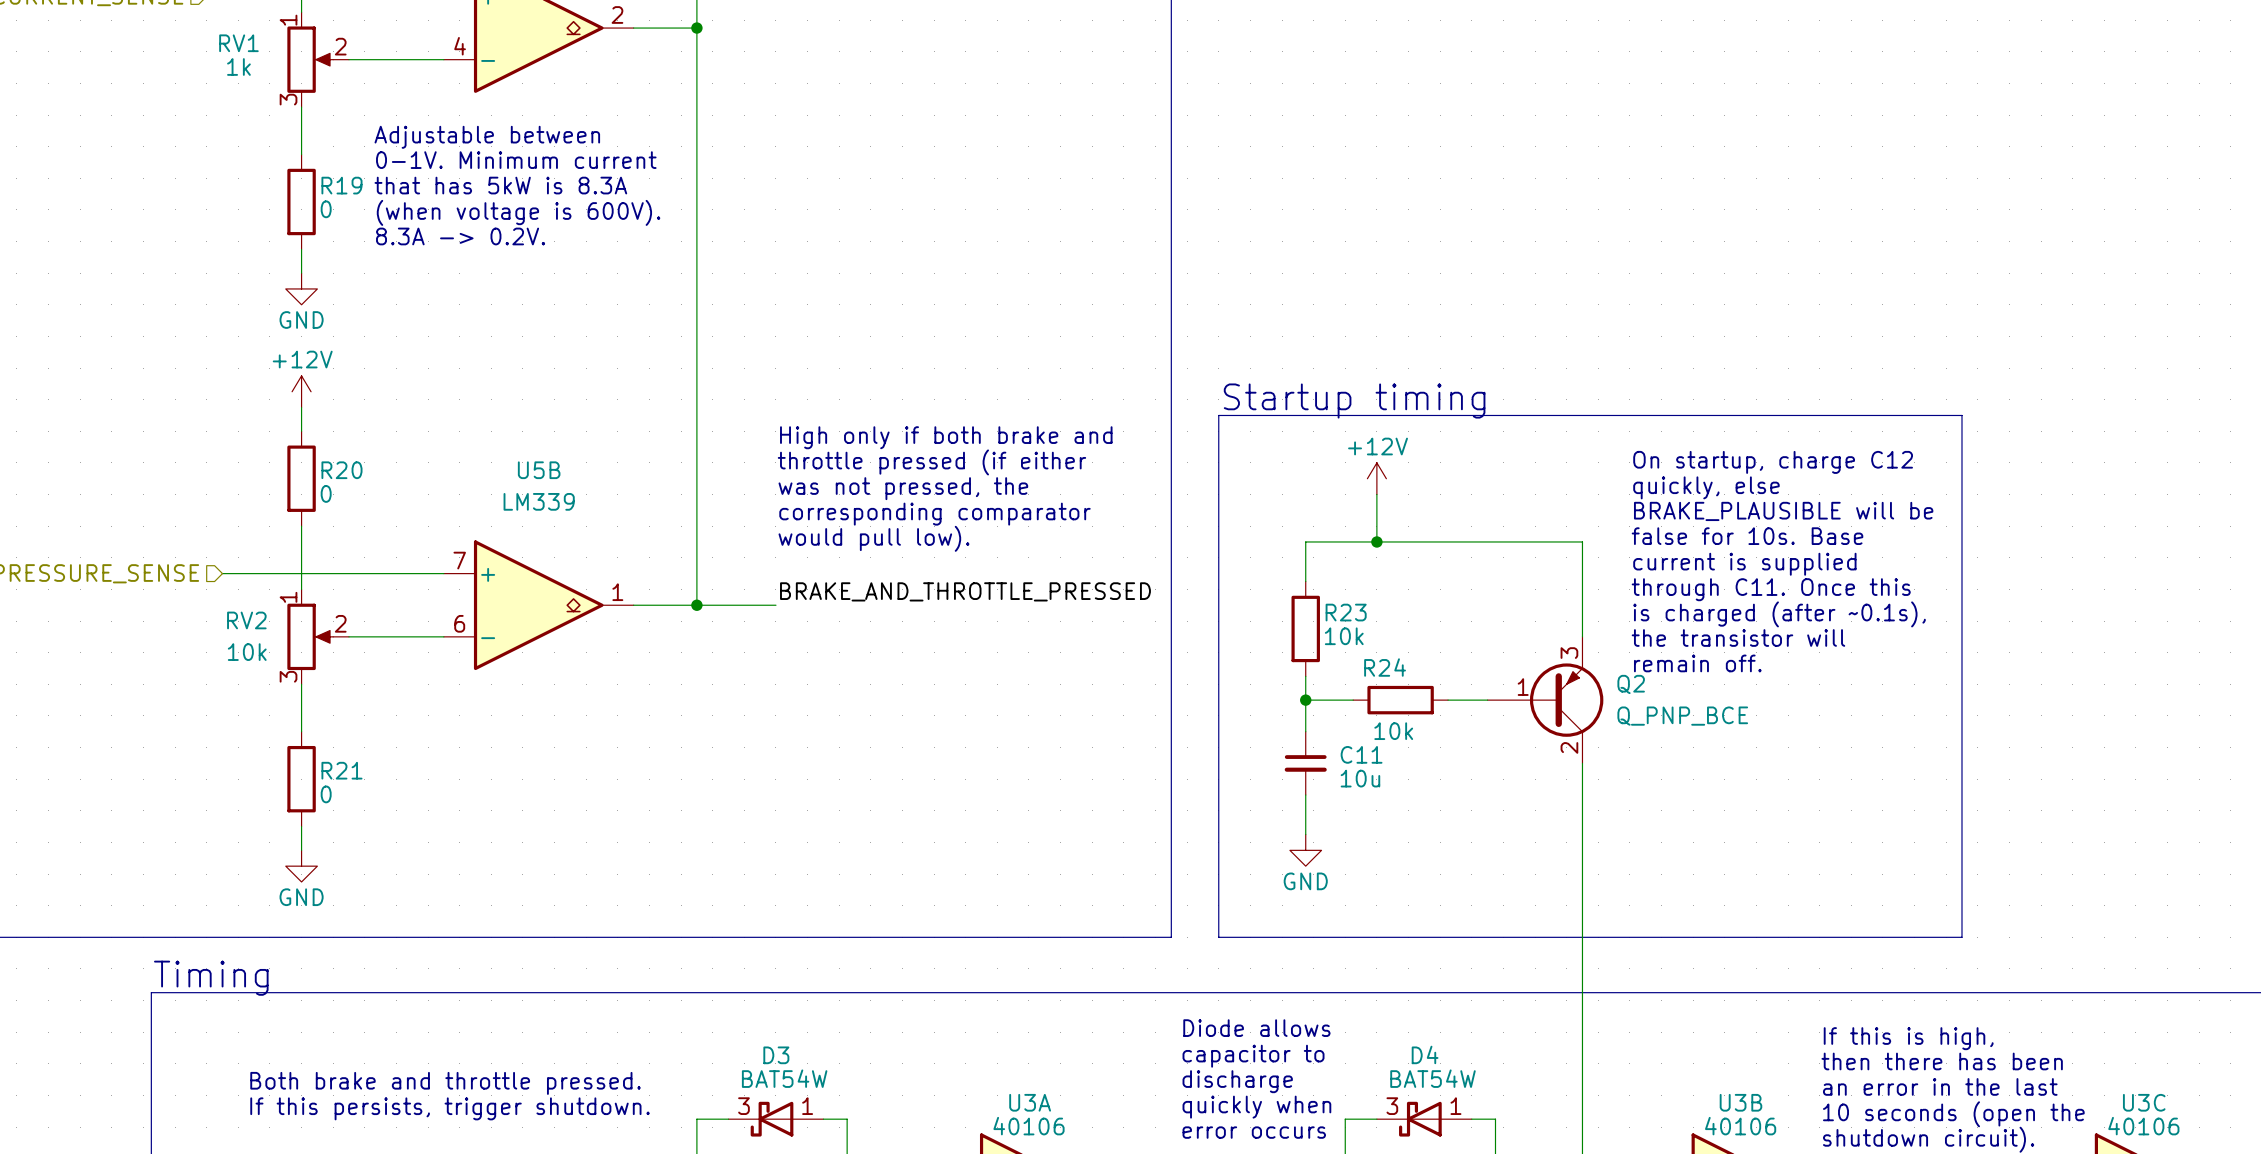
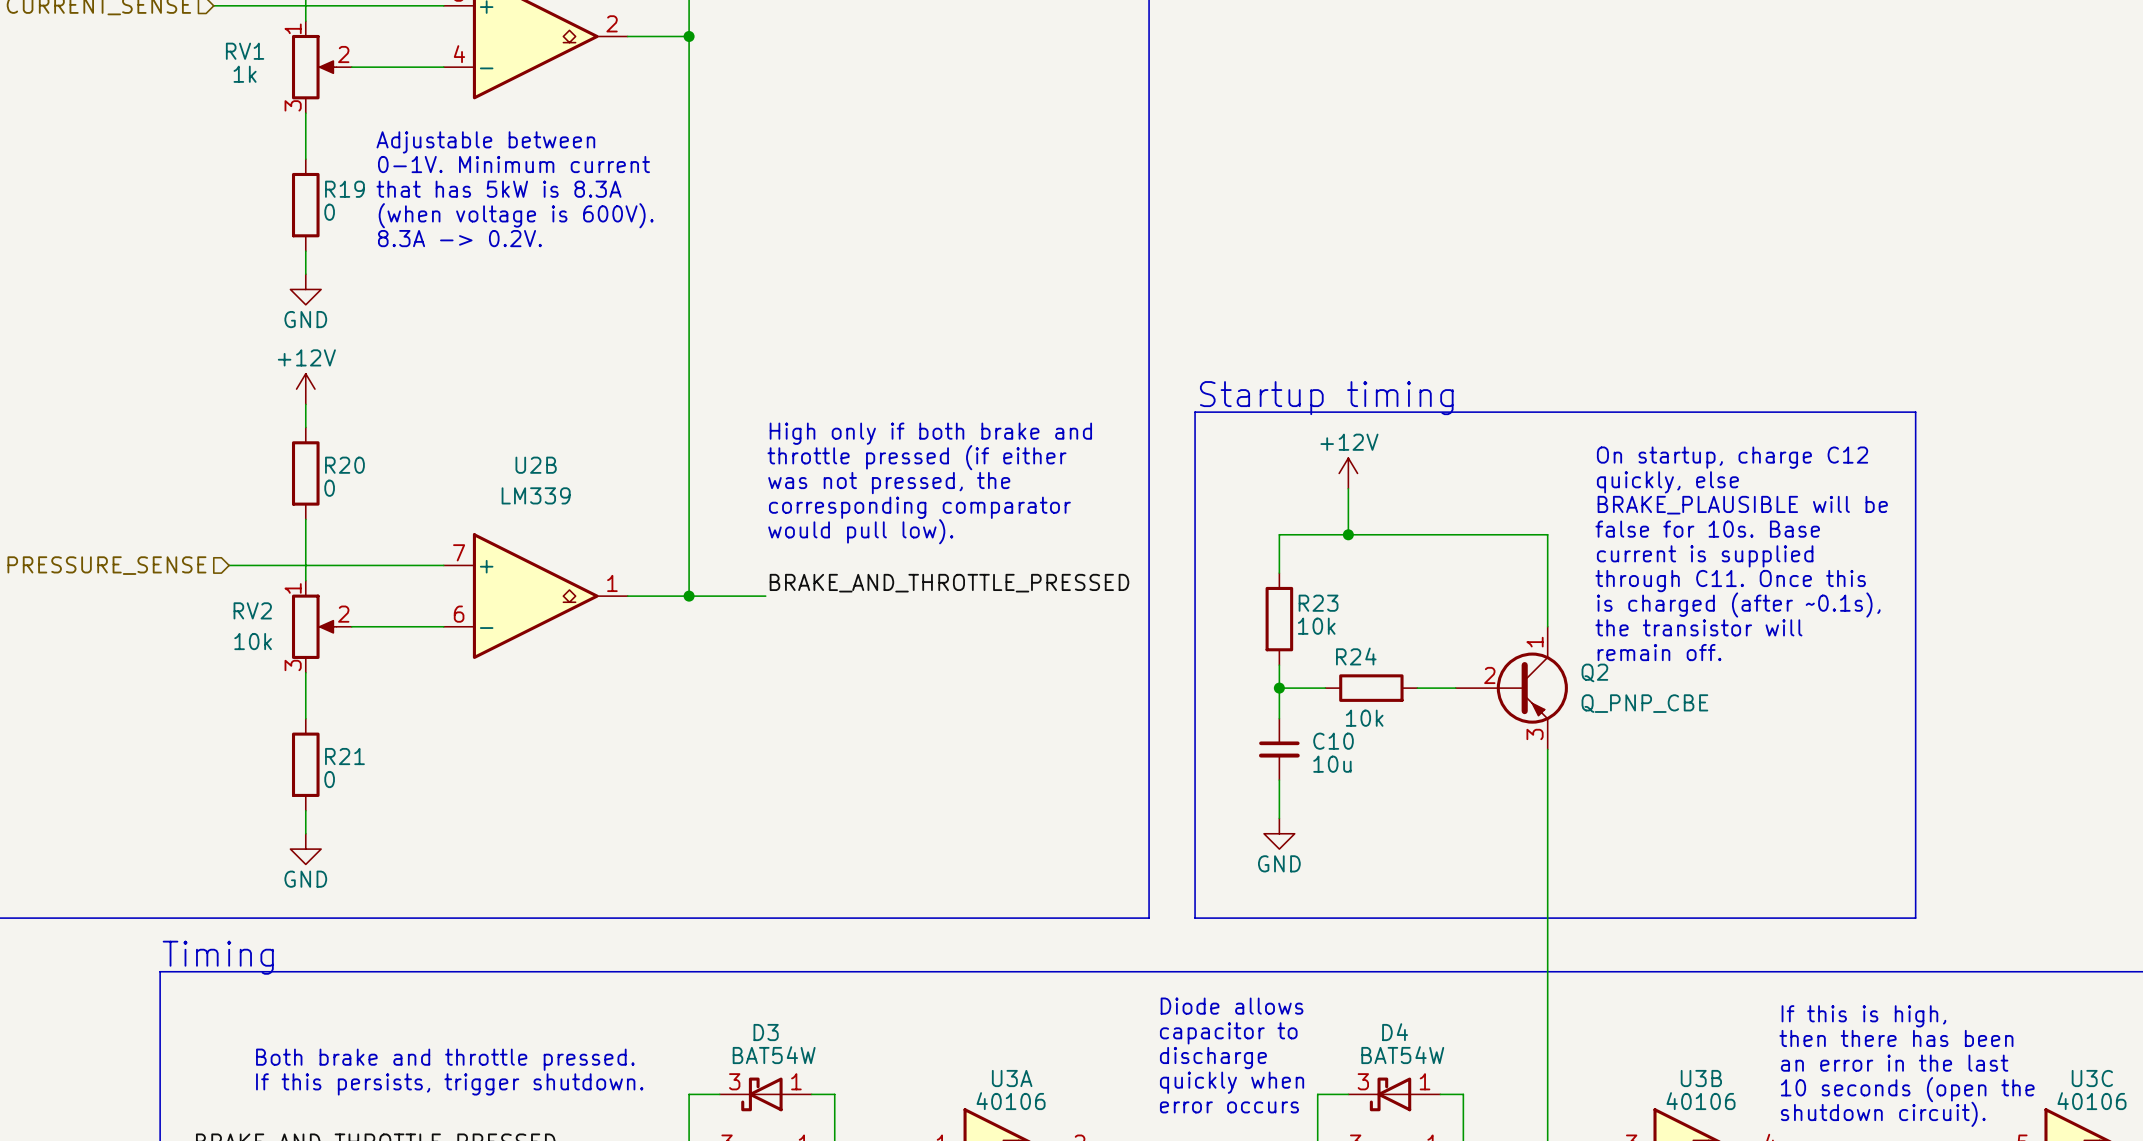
U5B name: U5B (539, 470) -> U2B (536, 465)
Q2 symbol: [1487, 636, 1604, 764] -> [1455, 626, 1568, 750]
Q2 value: Q_PNP_BCE (1682, 716) -> Q_PNP_CBE (1644, 703)
C11 name: C11 (1361, 754) -> C10 (1333, 741)

